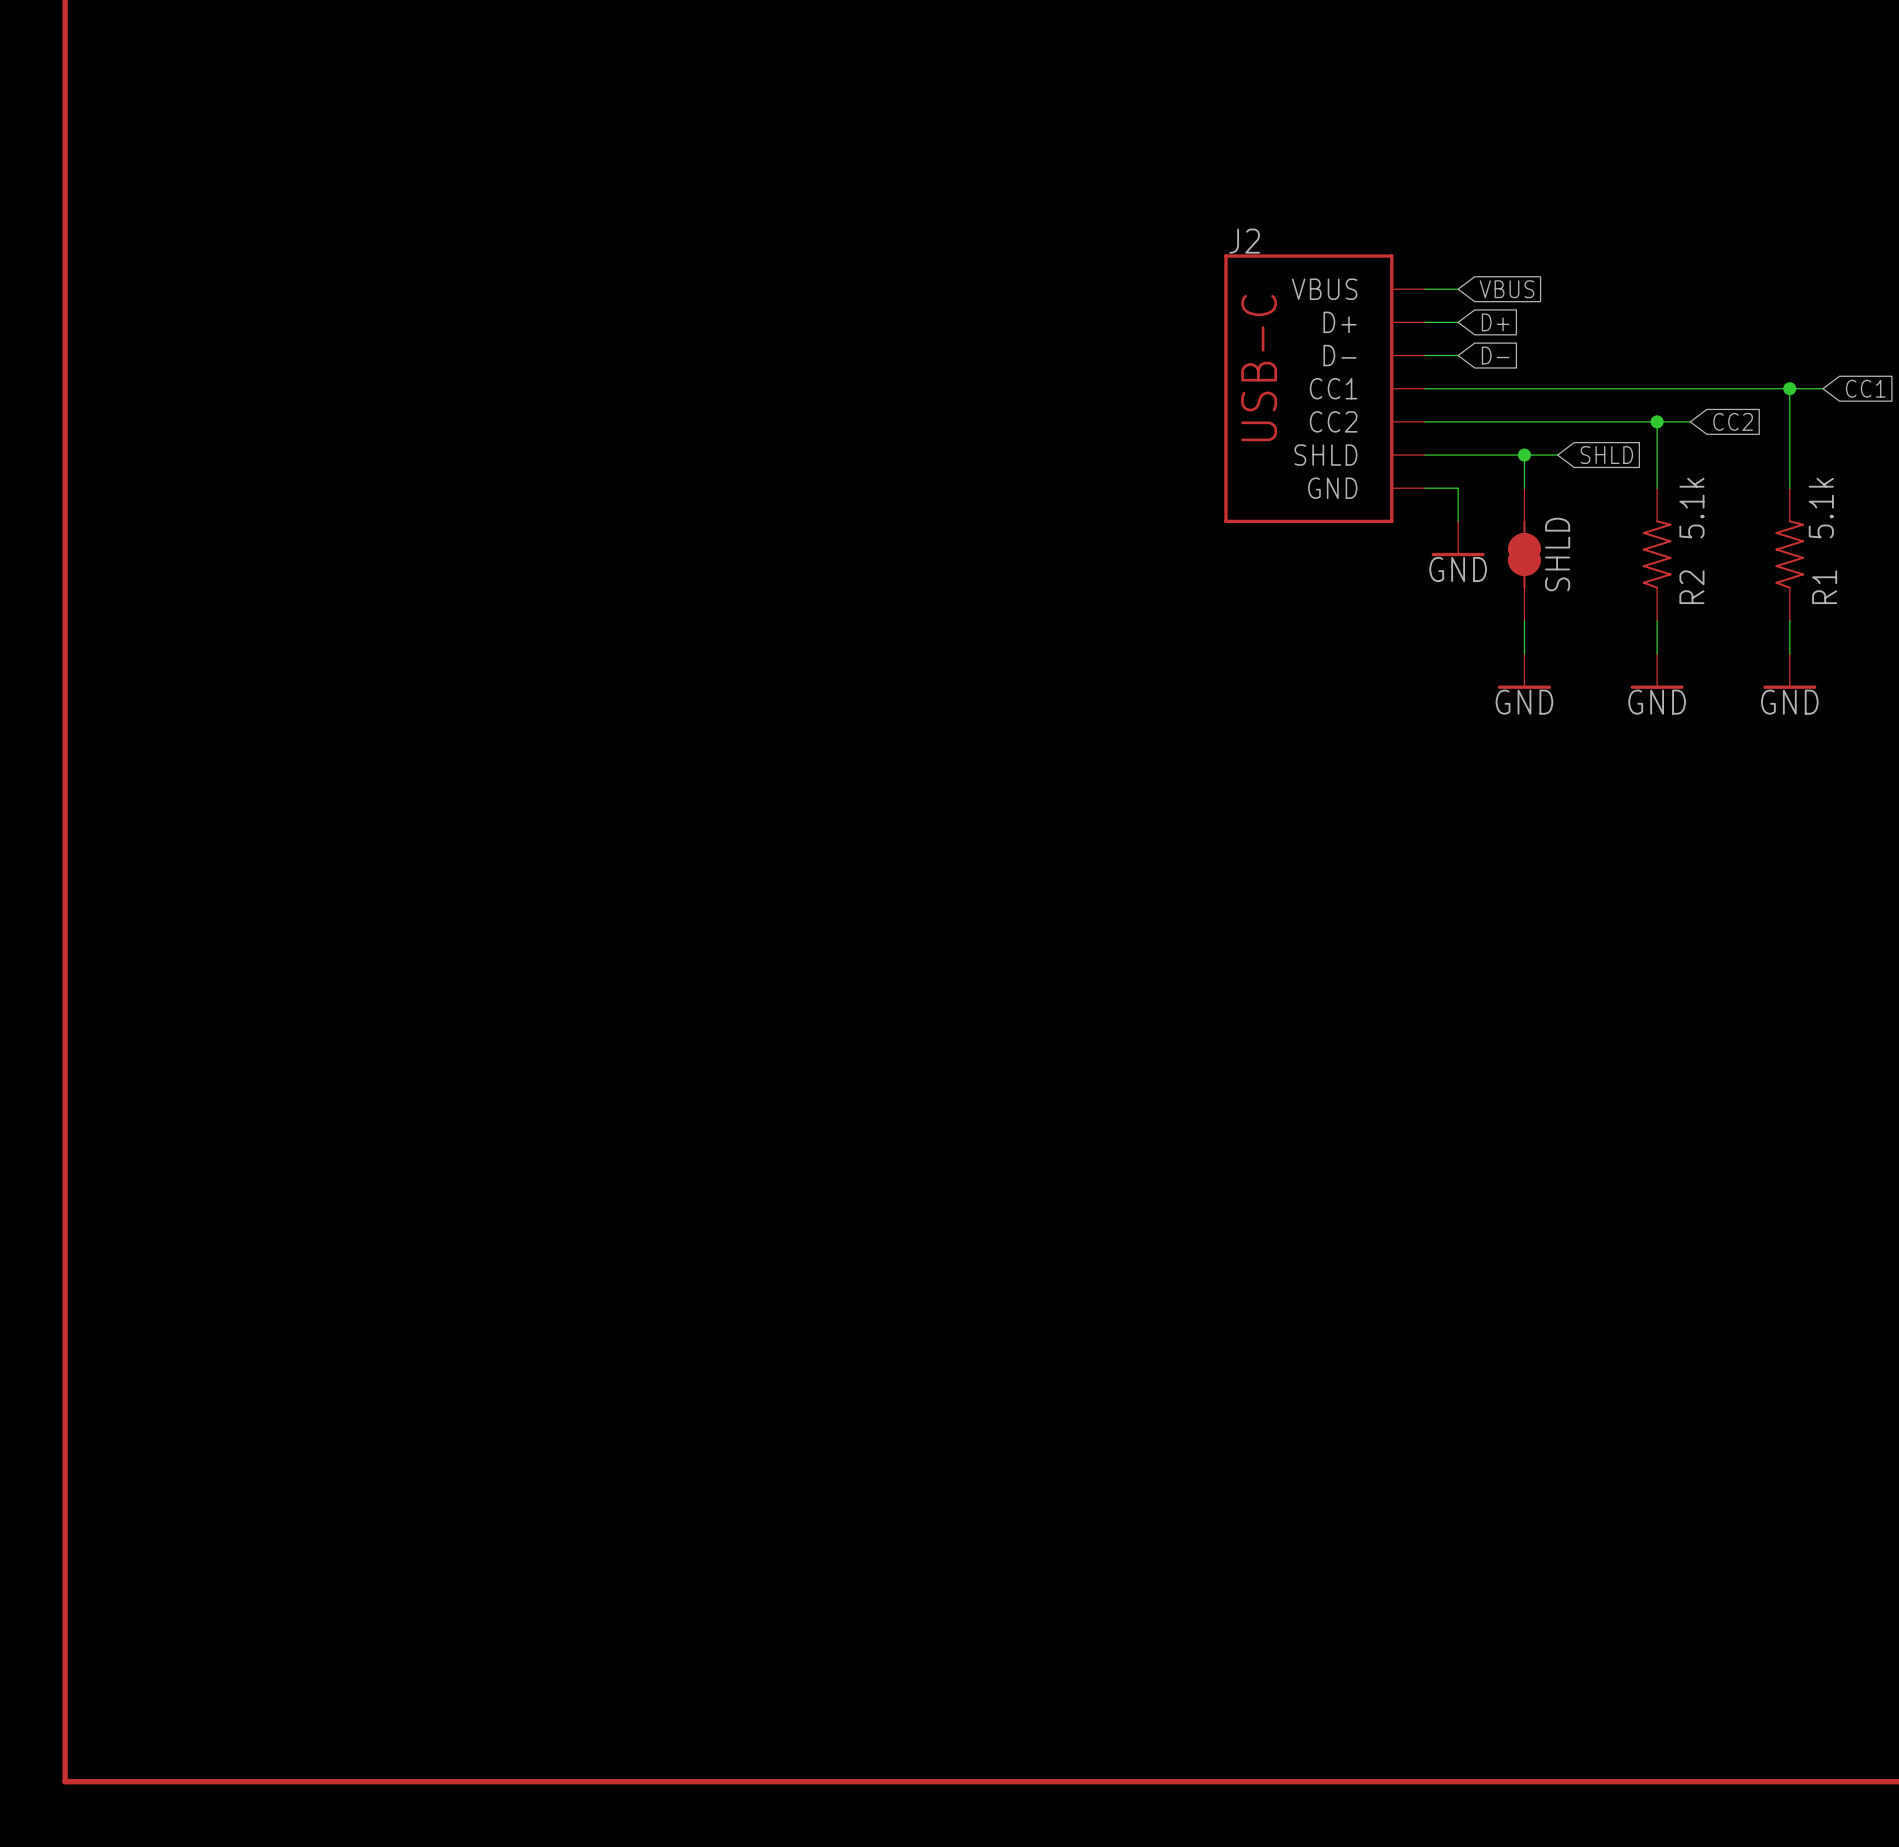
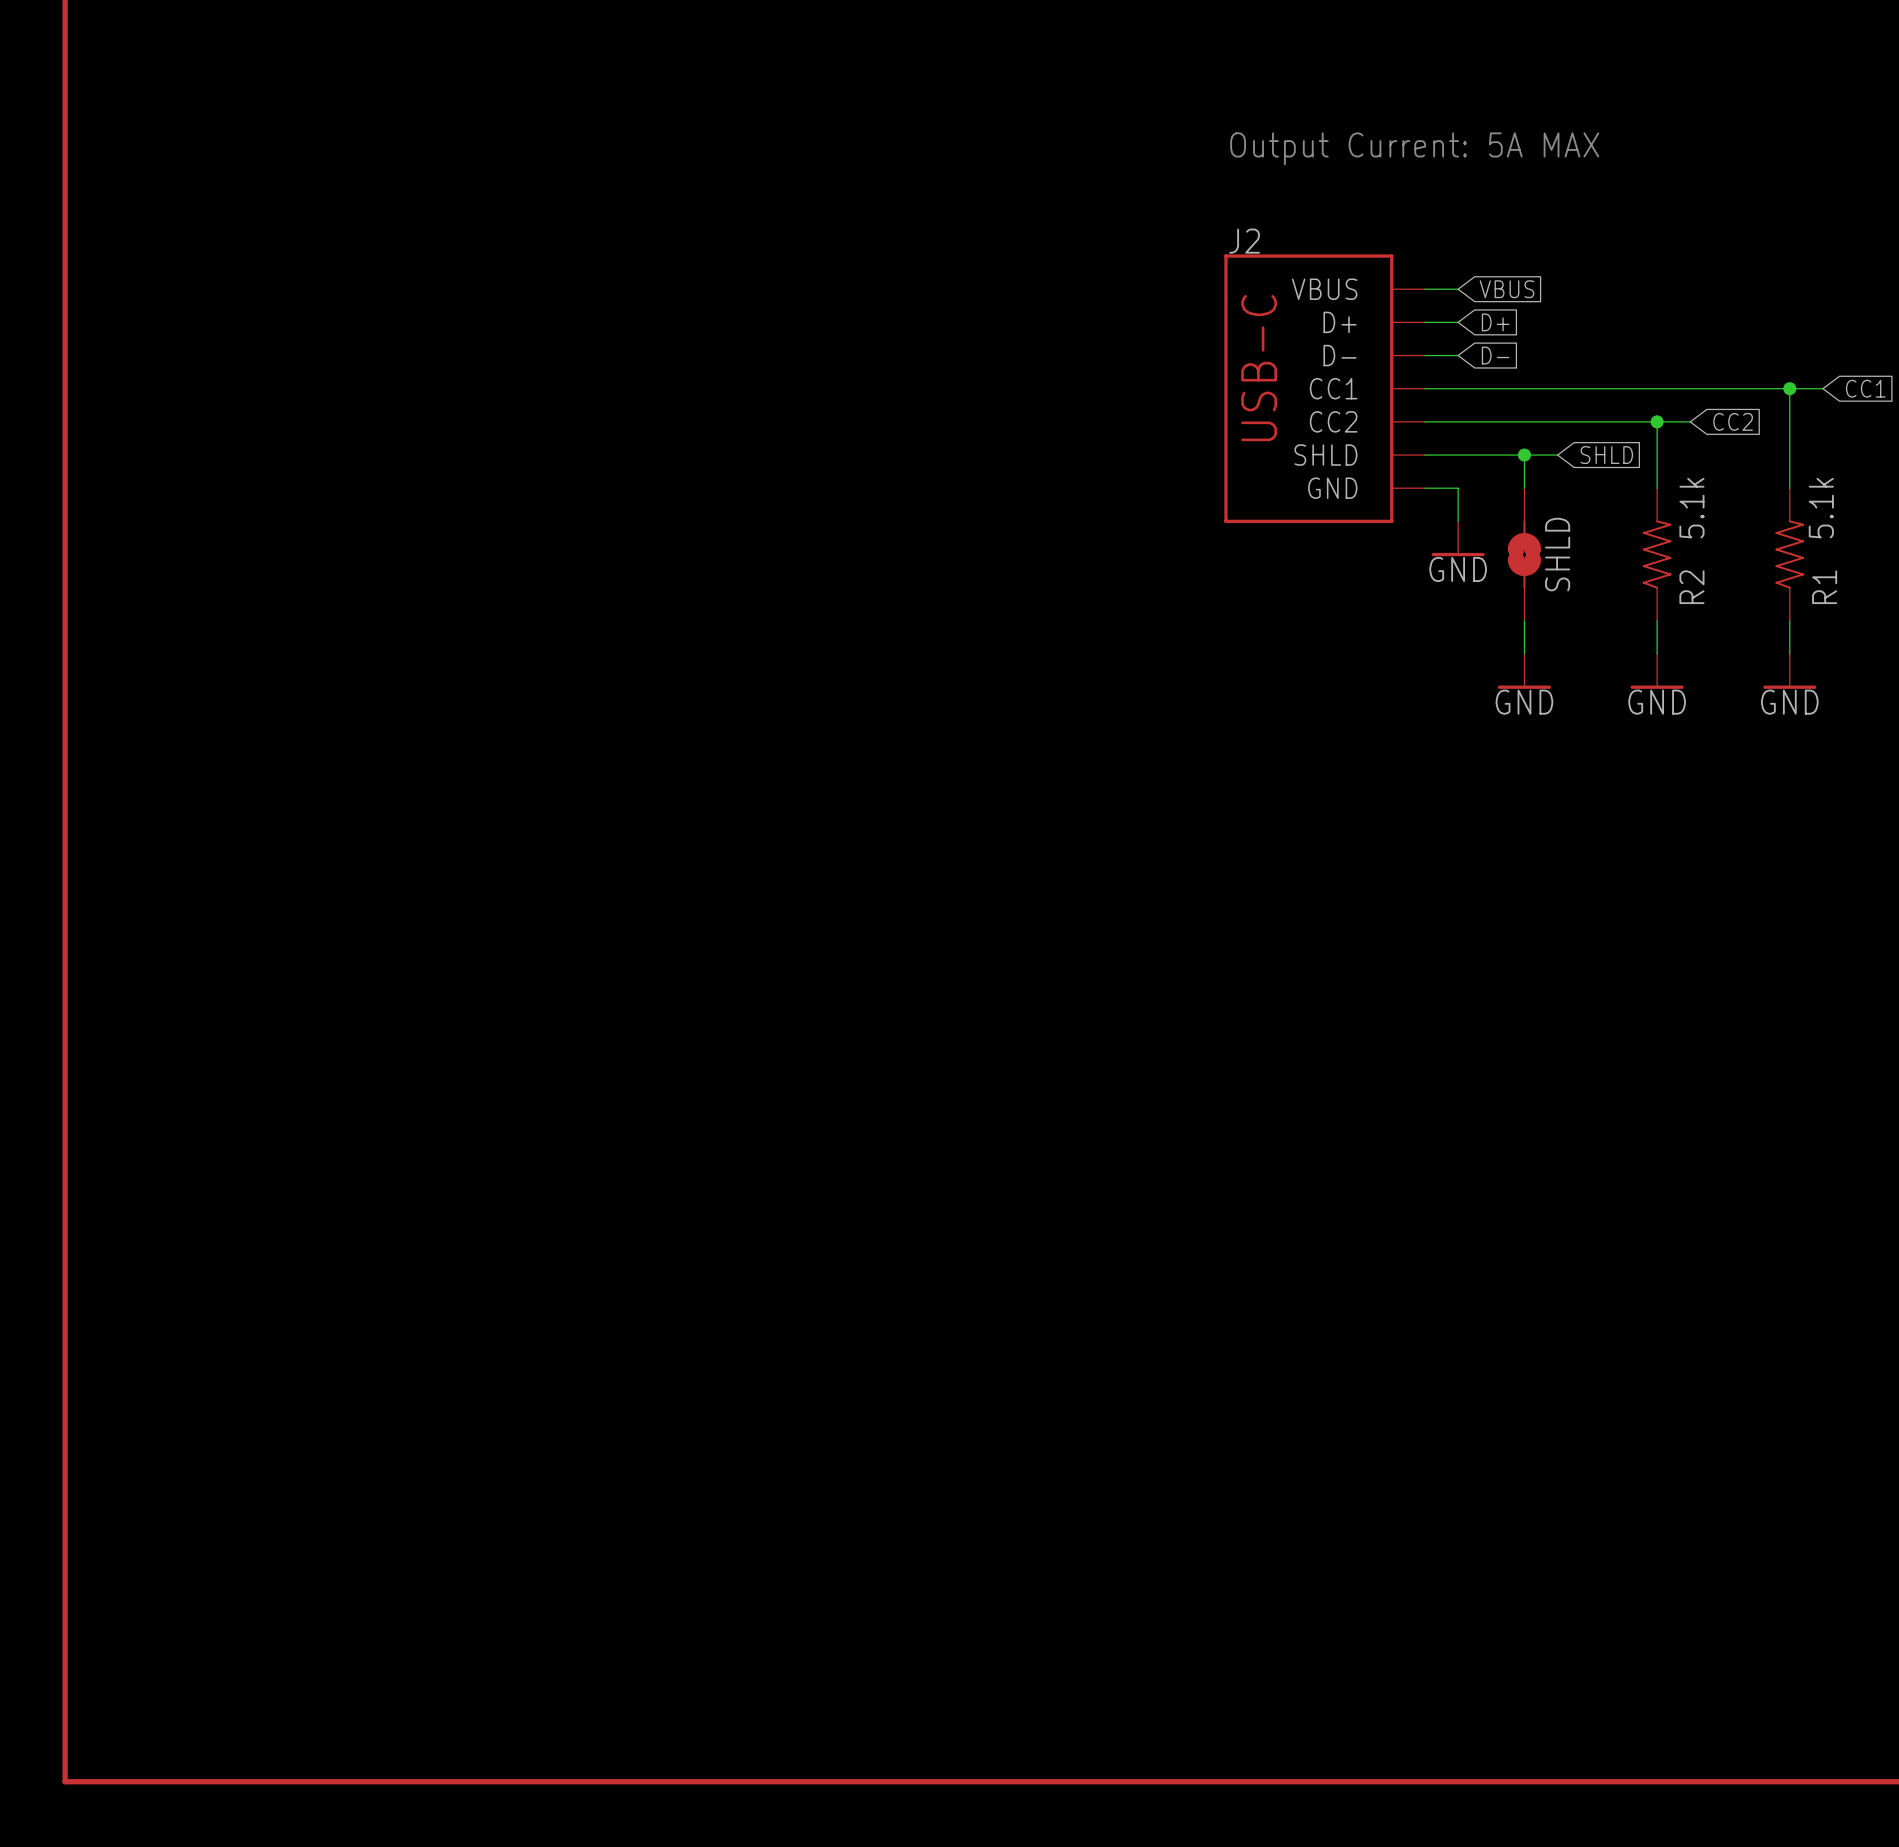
text: none -> Output Current: 5A MAX (1414, 148)
SHLD symbol: [1507, 488, 1542, 621] -> [1507, 488, 1542, 621]

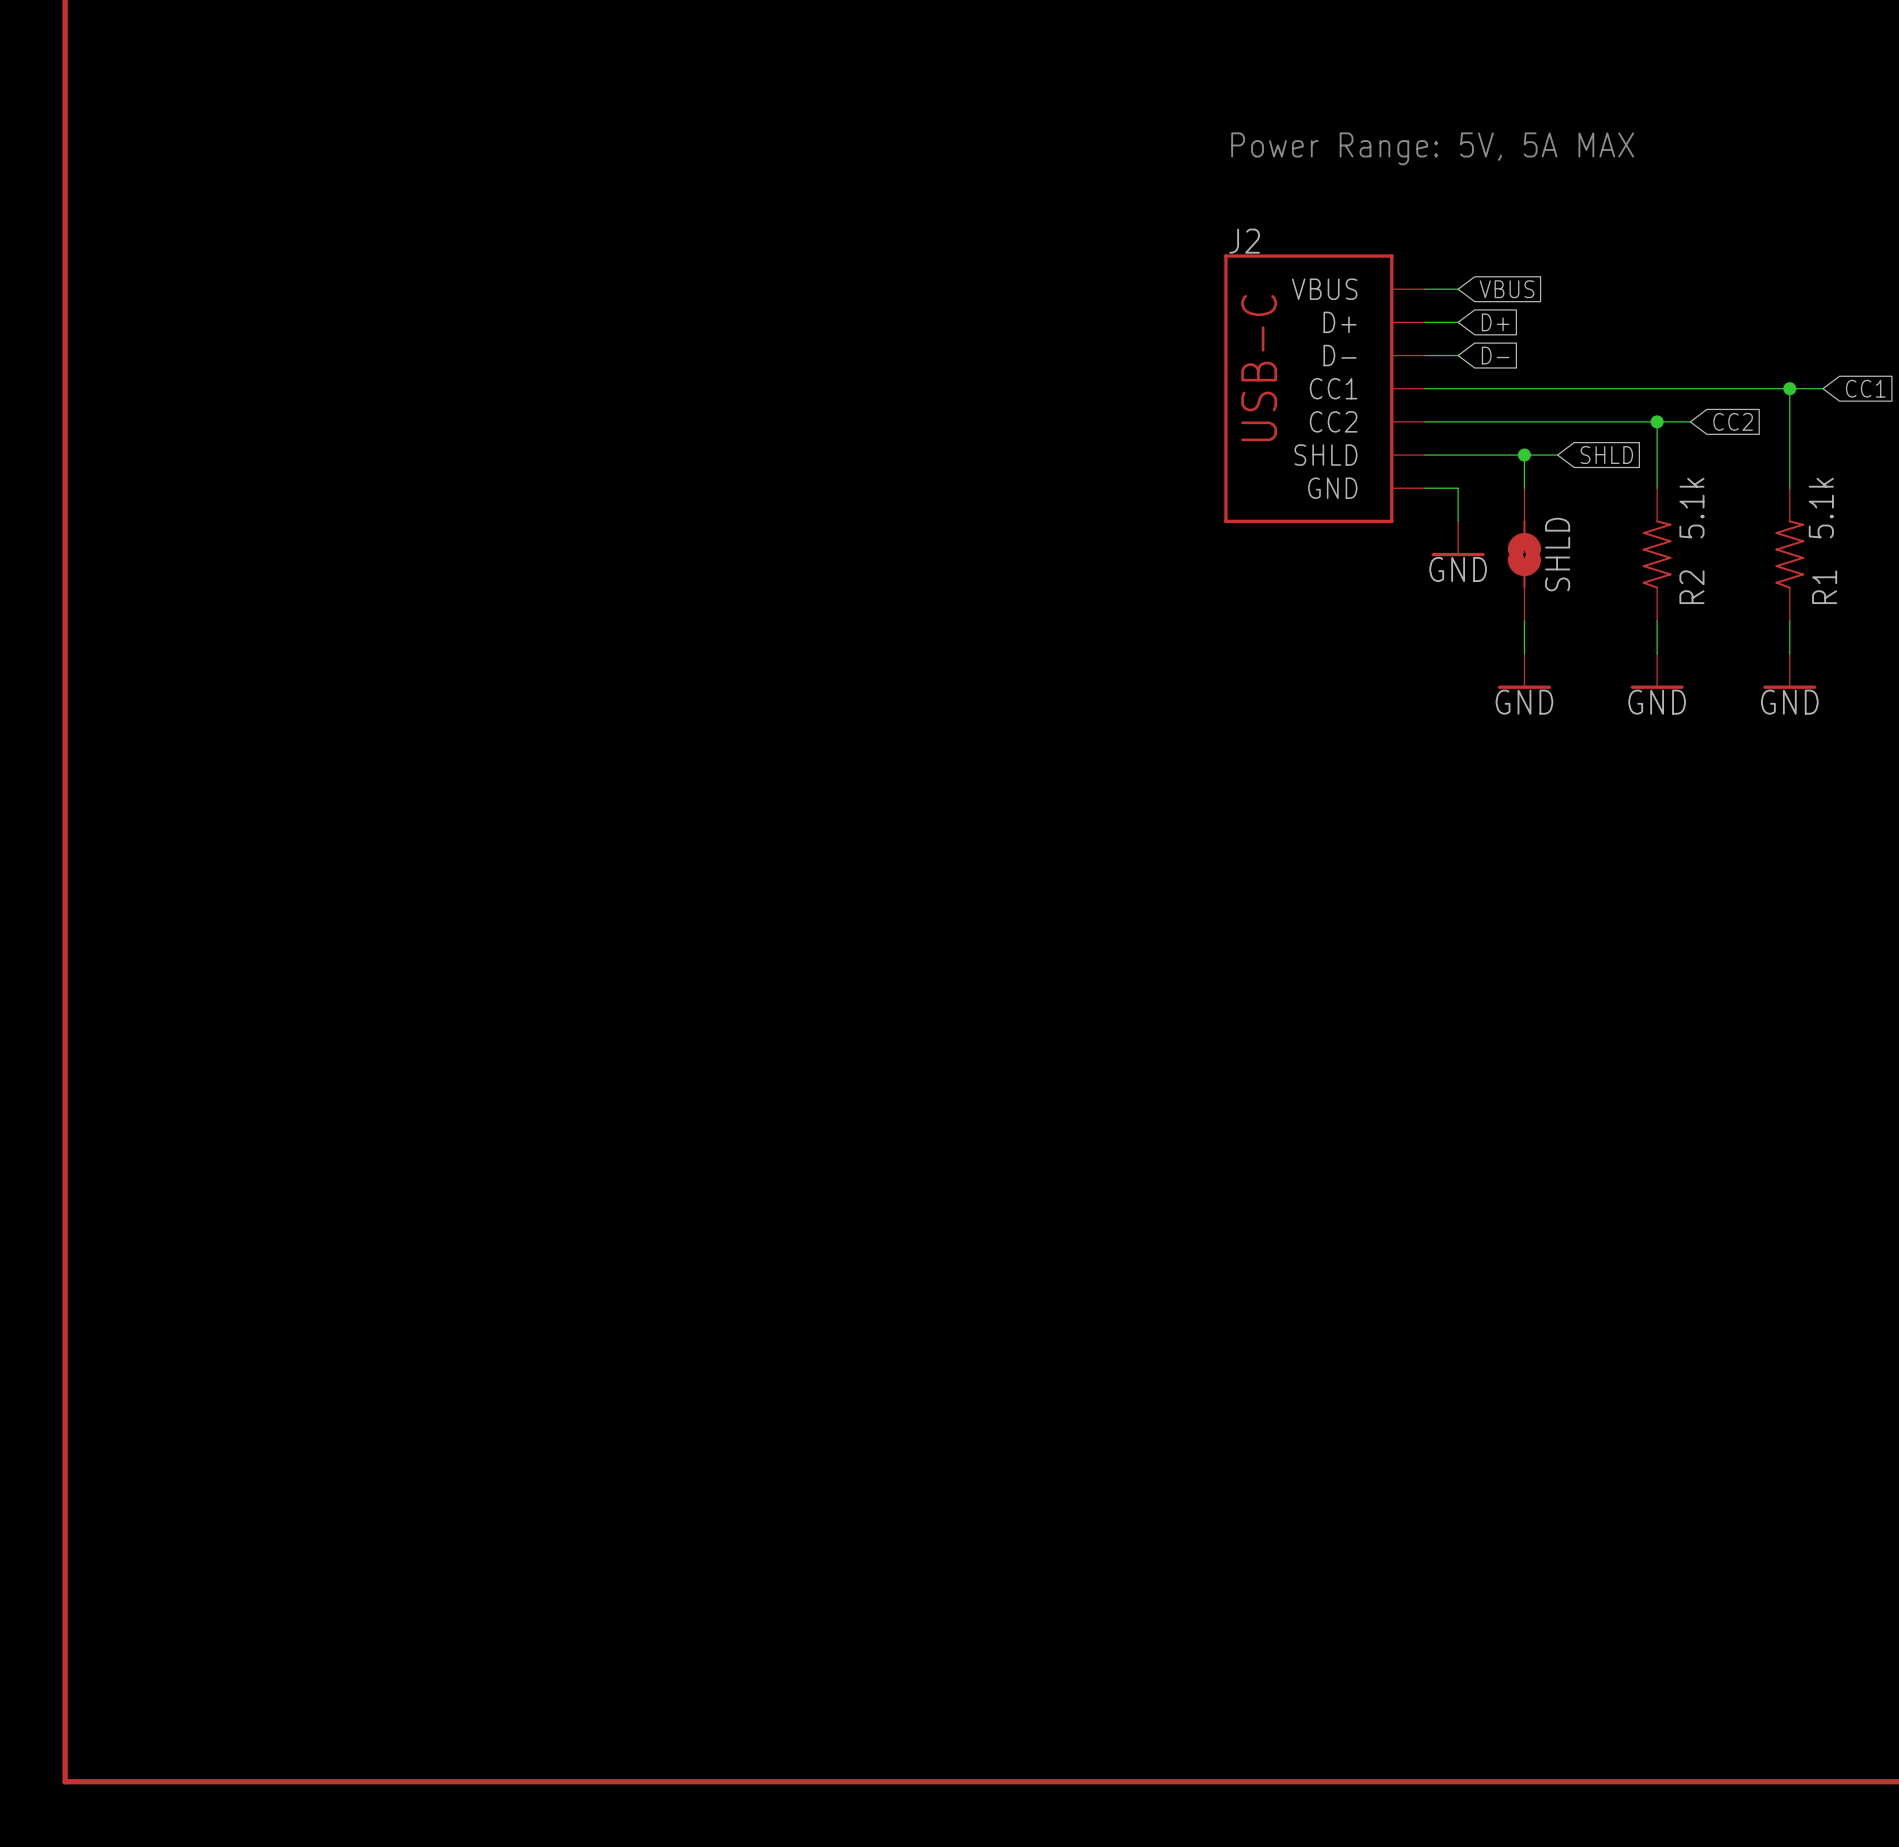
text: Output Current: 5A MAX (1414, 148) -> Power Range: 5V, 5A MAX (1432, 148)

